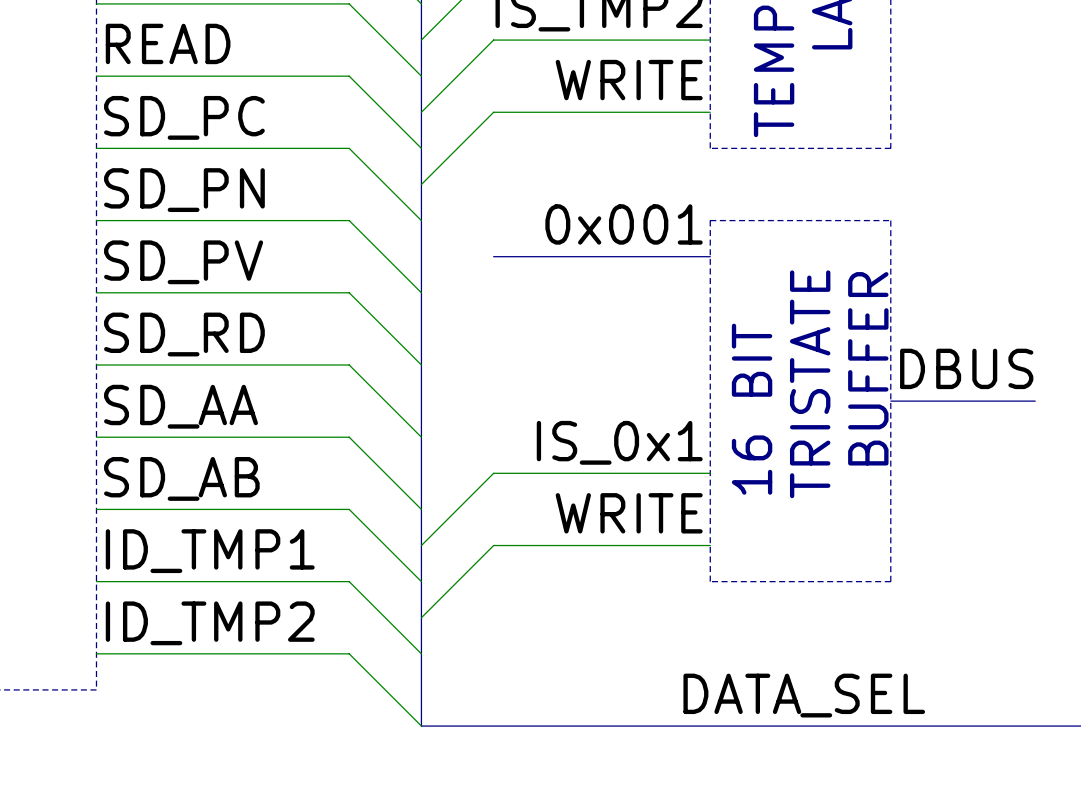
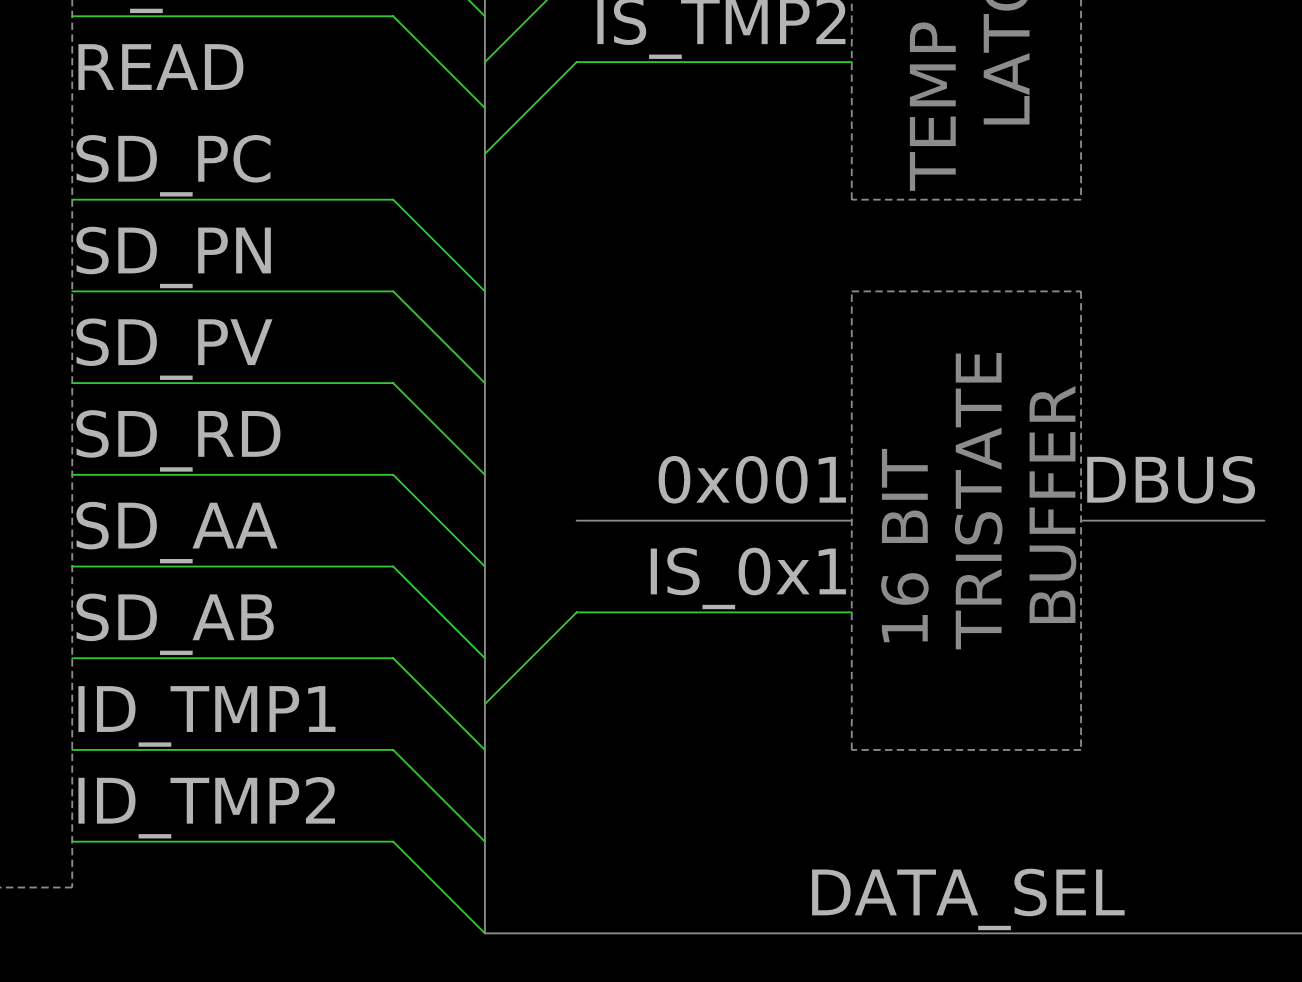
wire: (96, 76) (349, 76) (421, 148) -> none
label: WRITE (629, 80) -> none
wire: (710, 112) (493, 112) (421, 184) -> none
label position: 0x001 (624, 224) -> 0x001 (752, 479)
bus: (493, 256) (710, 256) -> (576, 520) (851, 520)
label: WRITE (629, 513) -> none
wire: (710, 545) (493, 545) (421, 617) -> none

